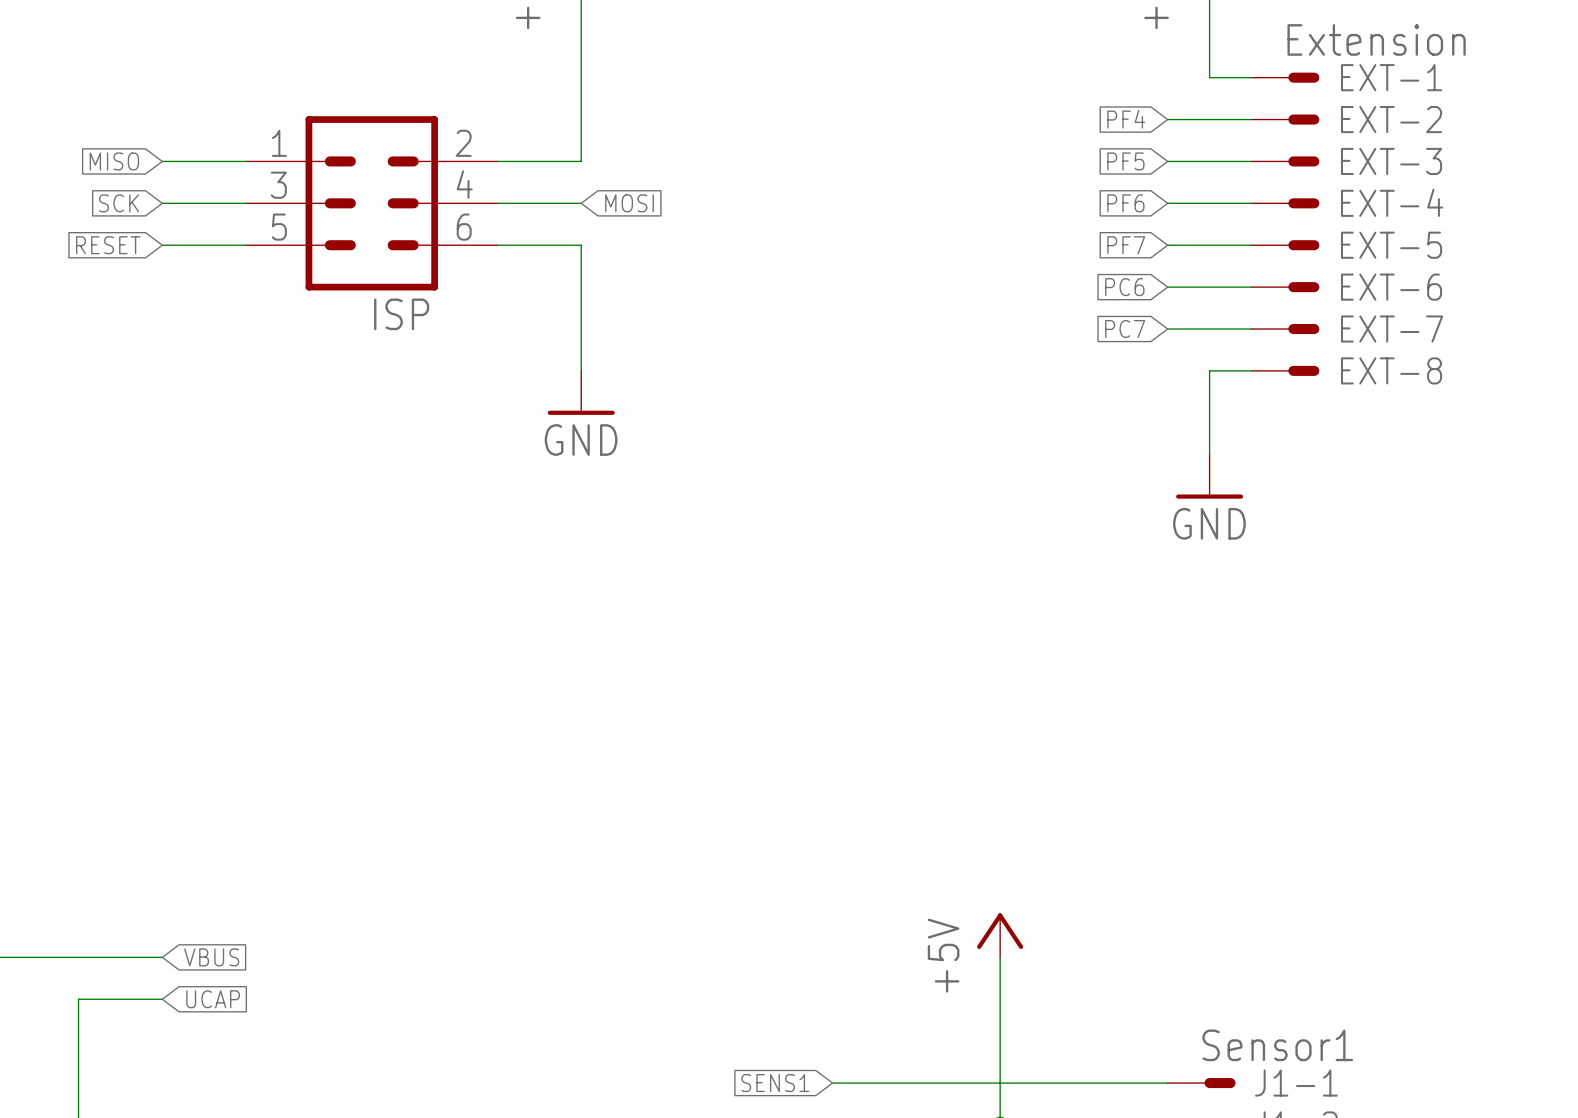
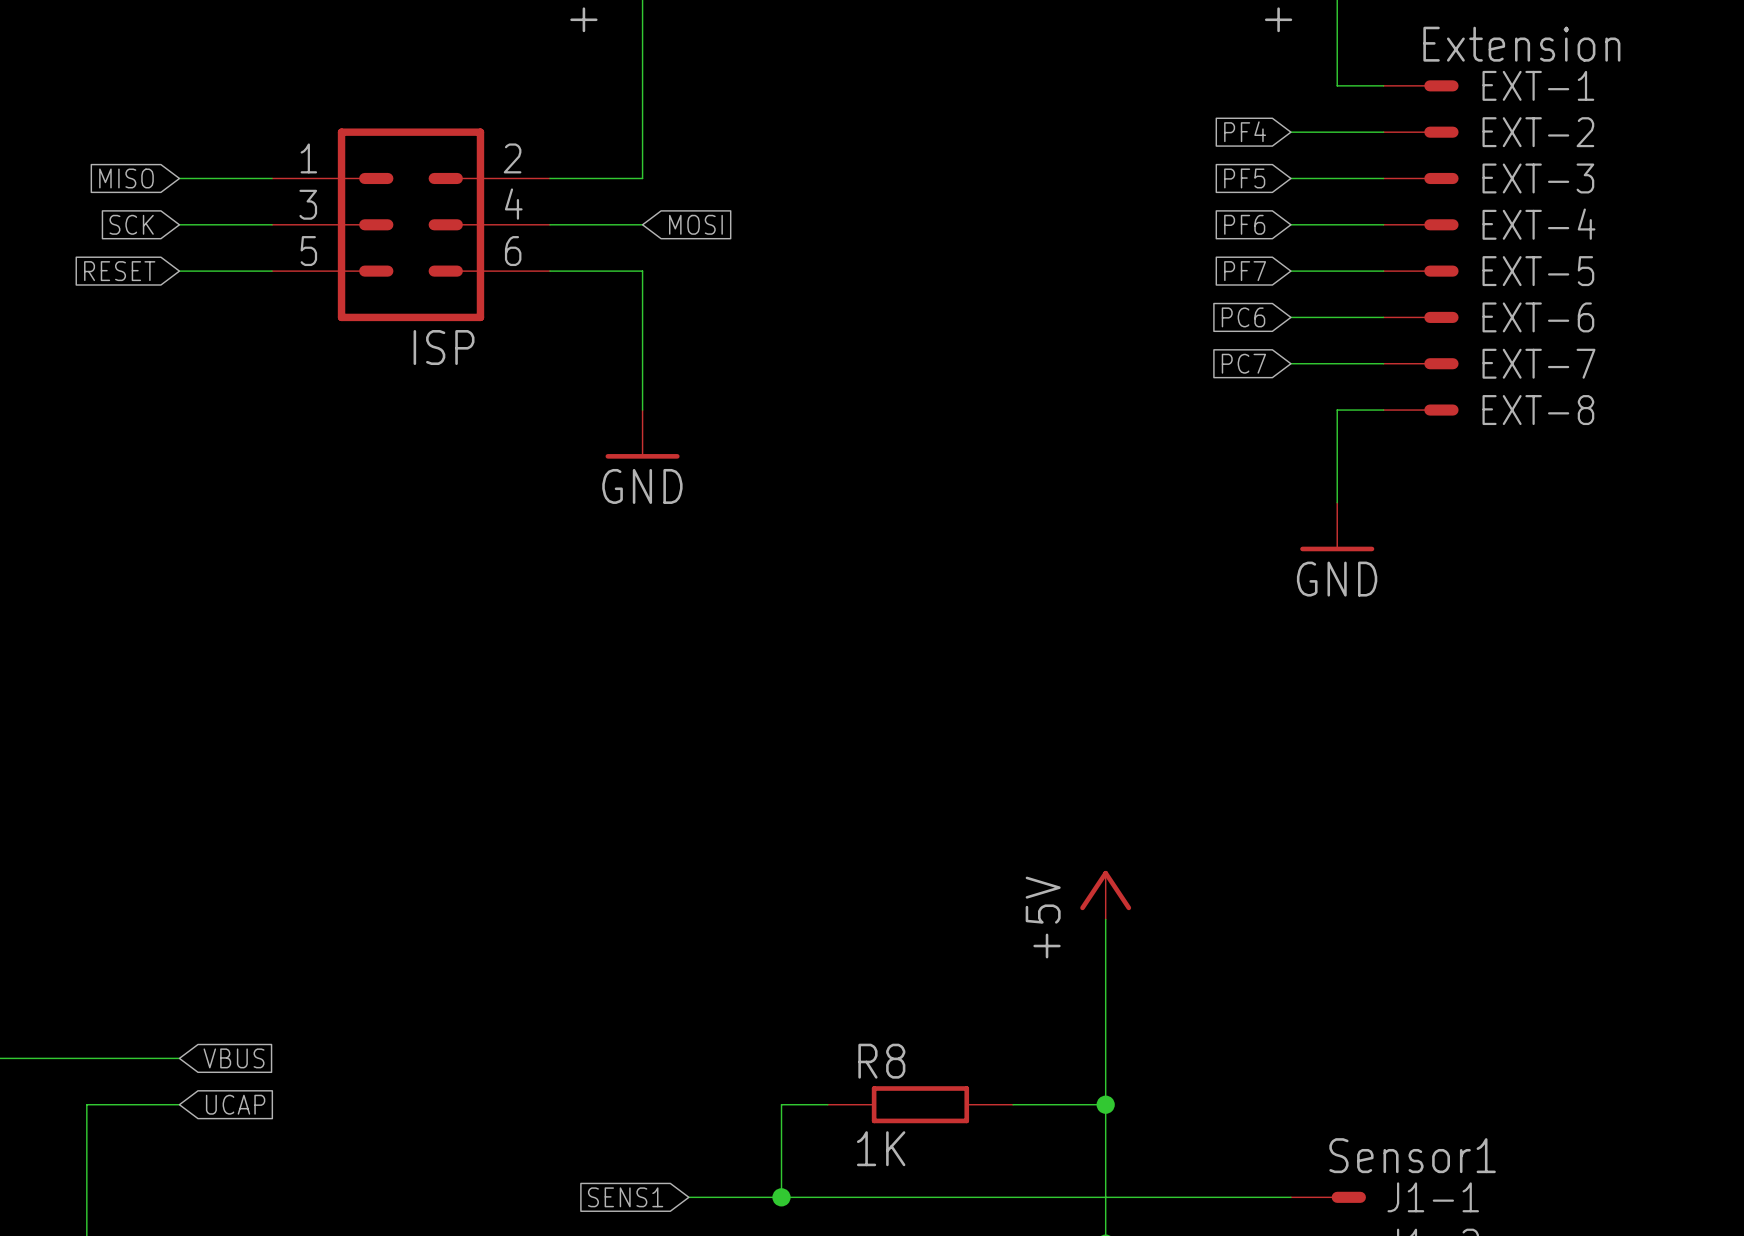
wire: none -> (1105, 919) (1105, 1058)
power symbol position: +5V (1000, 935) -> +5V (1105, 895)
wire: none -> (827, 1104) (781, 1104) (781, 1197)
R8: none -> 1K (920, 1104)
wire: none -> (1013, 1104) (1105, 1104)
junction: none -> (1105, 1104)
wire: none -> (688, 1197) (920, 1197)
junction: none -> (781, 1197)
global label position: SENS1 (775, 1083) -> SENS1 (625, 1197)

